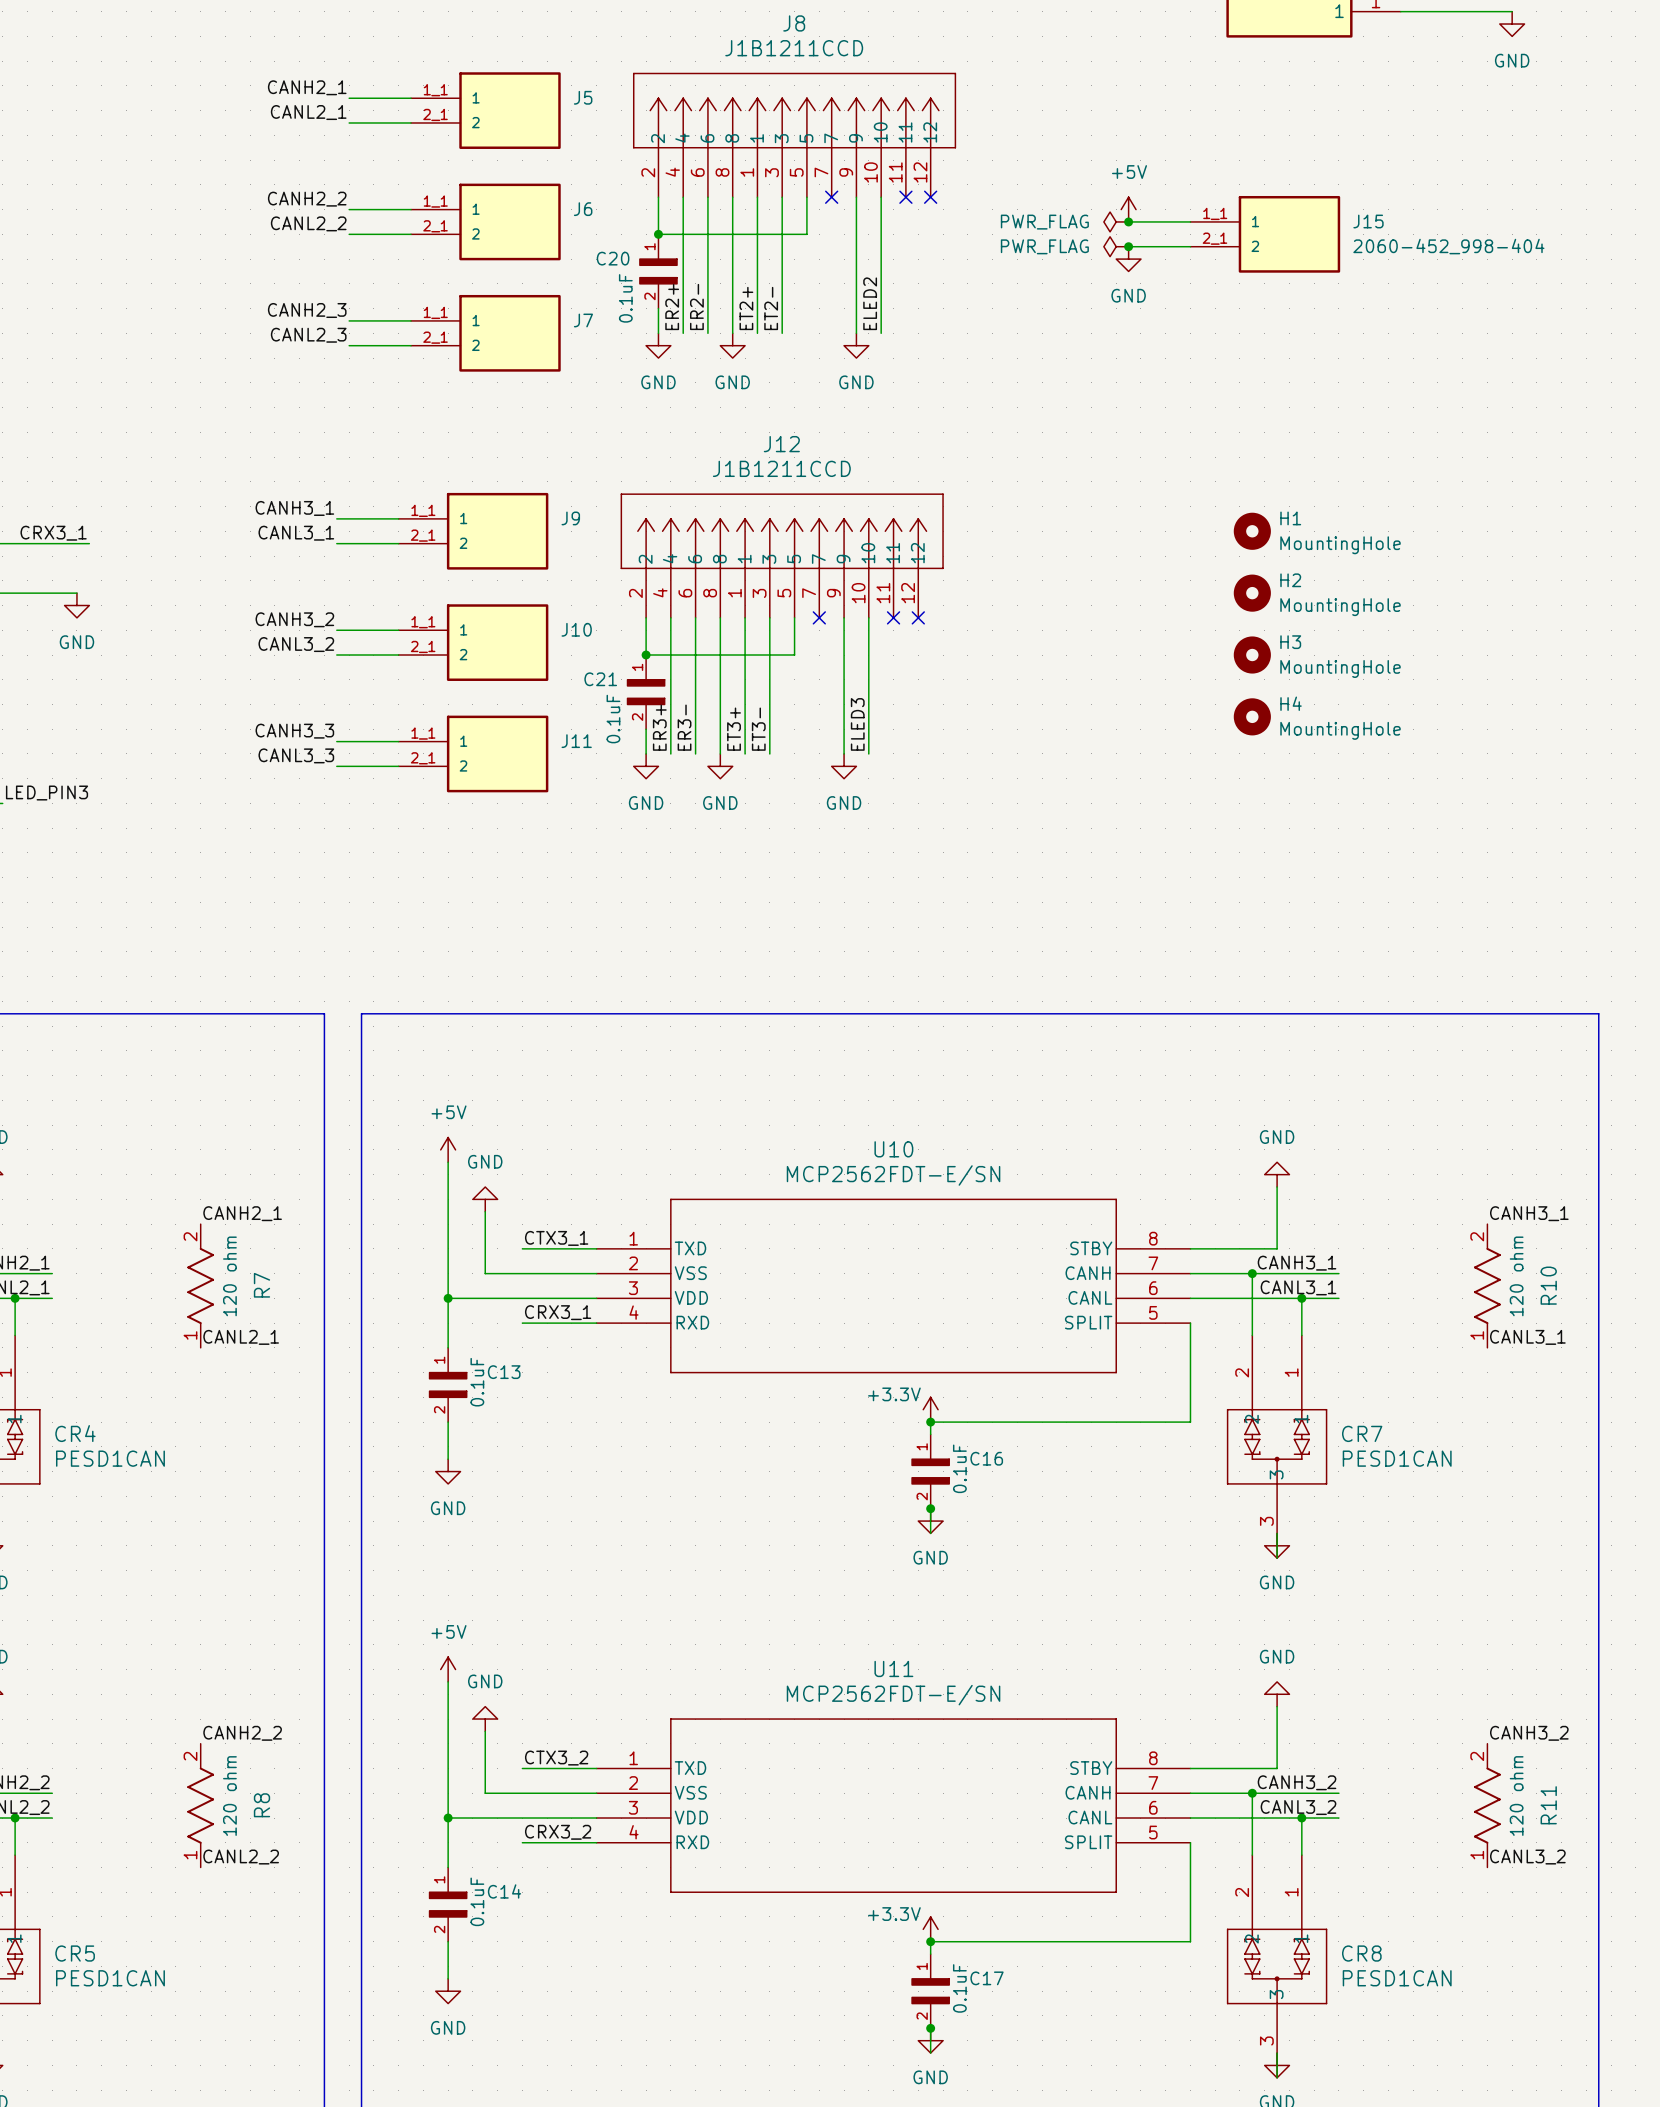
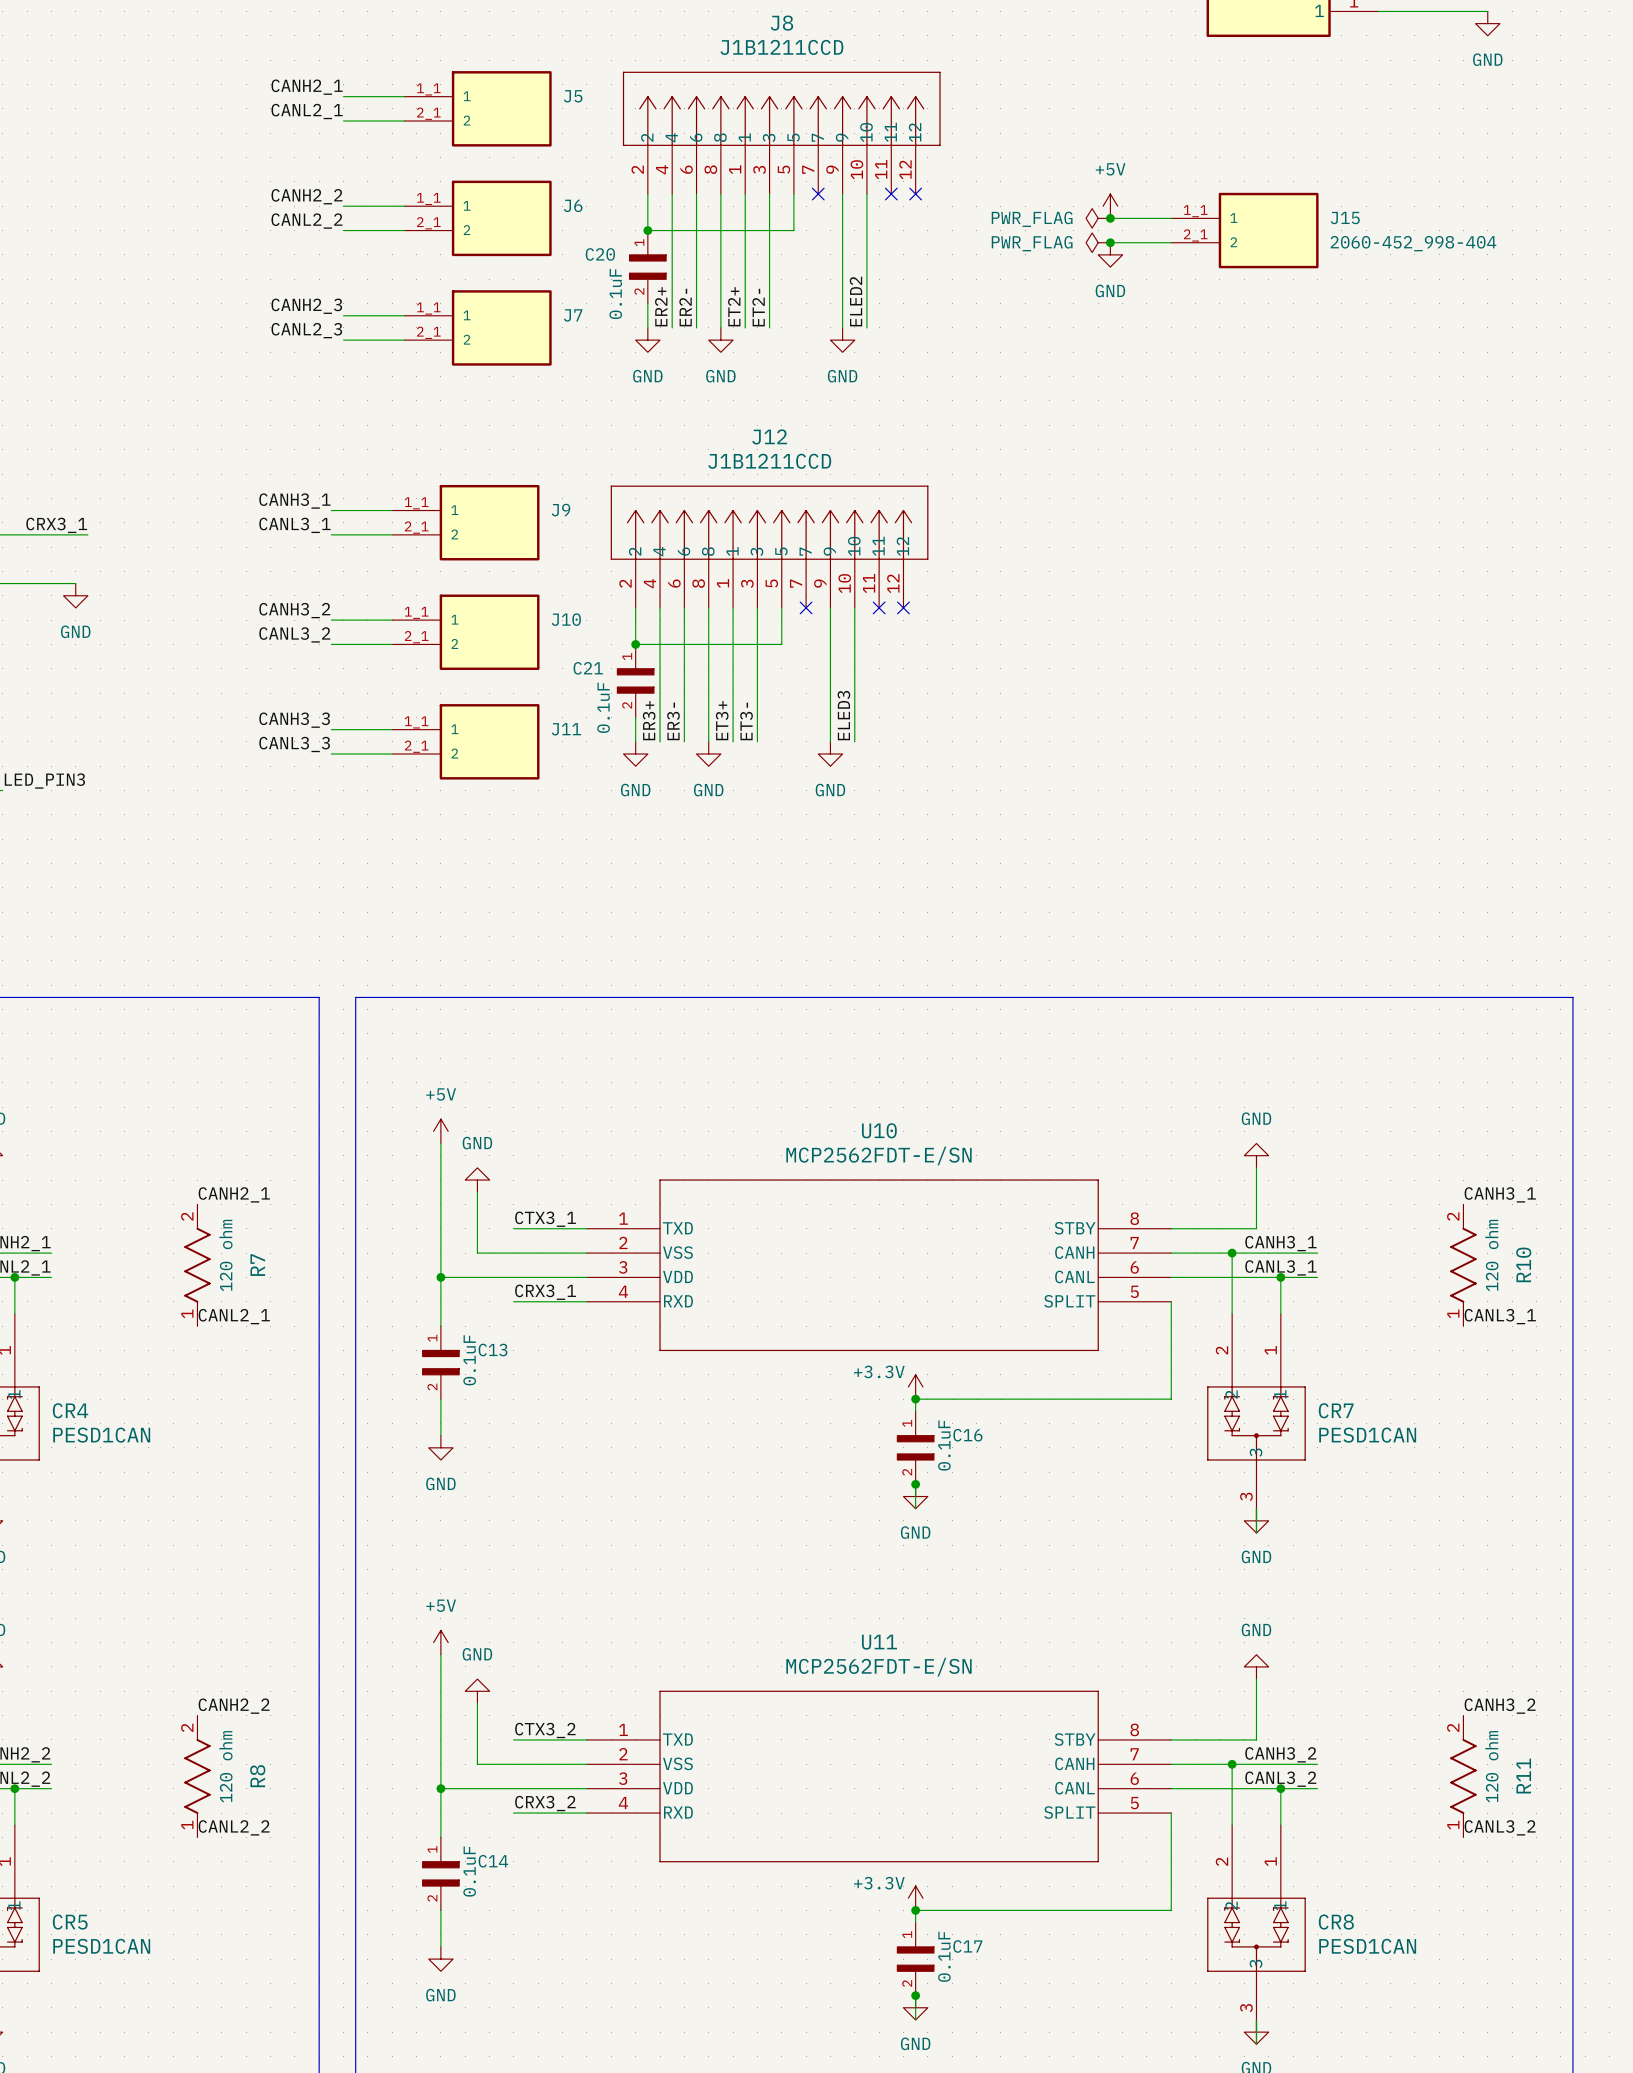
H1: MountingHole (1252, 531) -> none
H2: MountingHole (1252, 593) -> none
H3: MountingHole (1252, 655) -> none
H4: MountingHole (1252, 716) -> none

